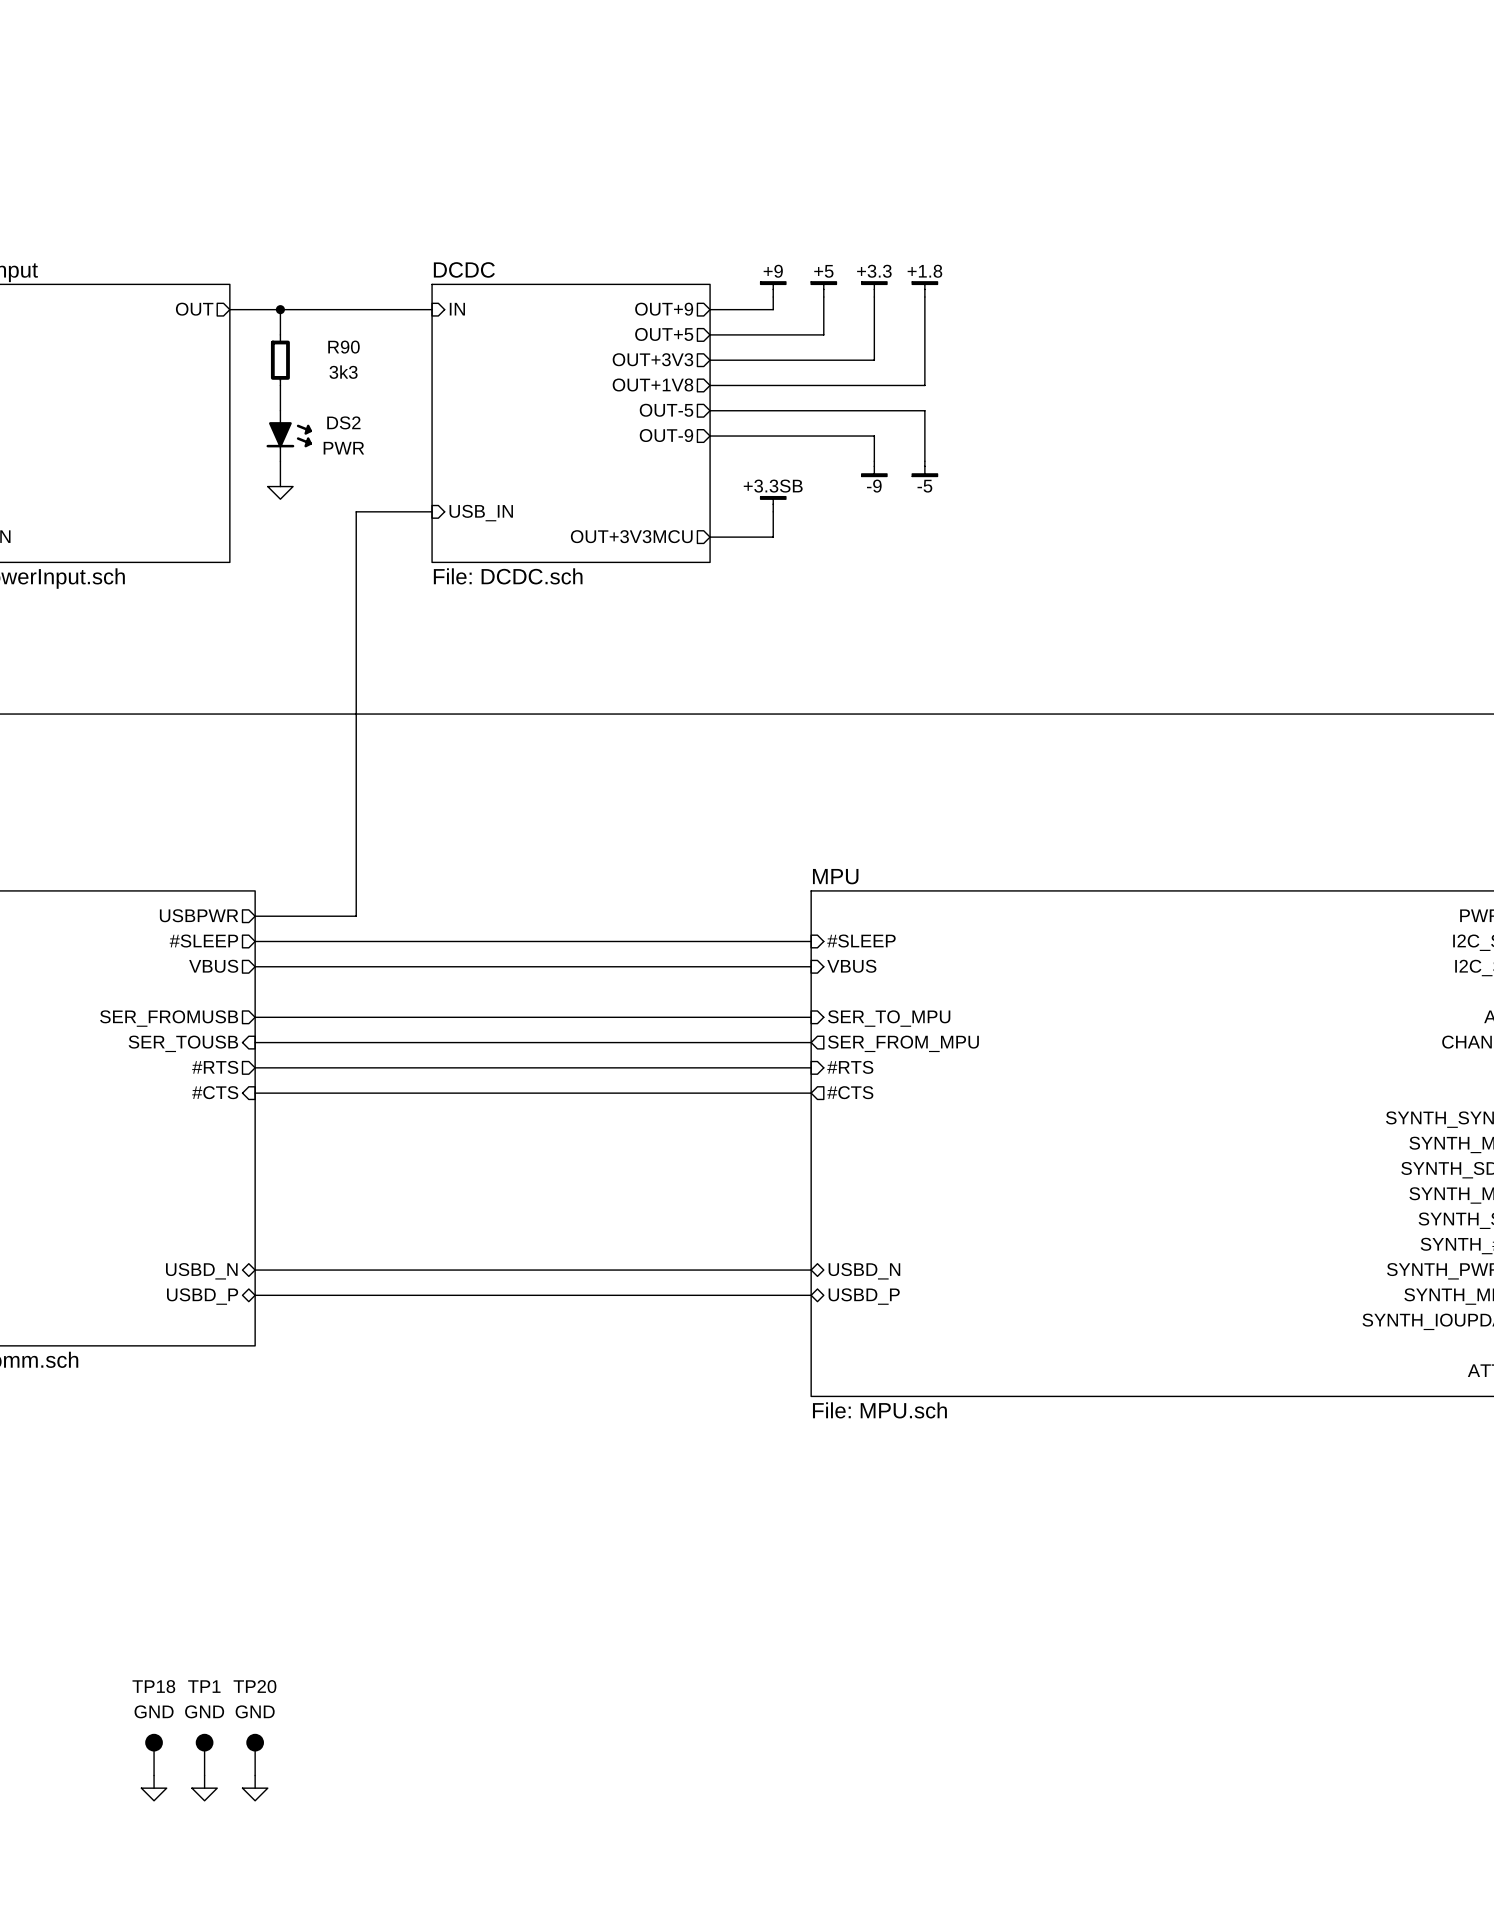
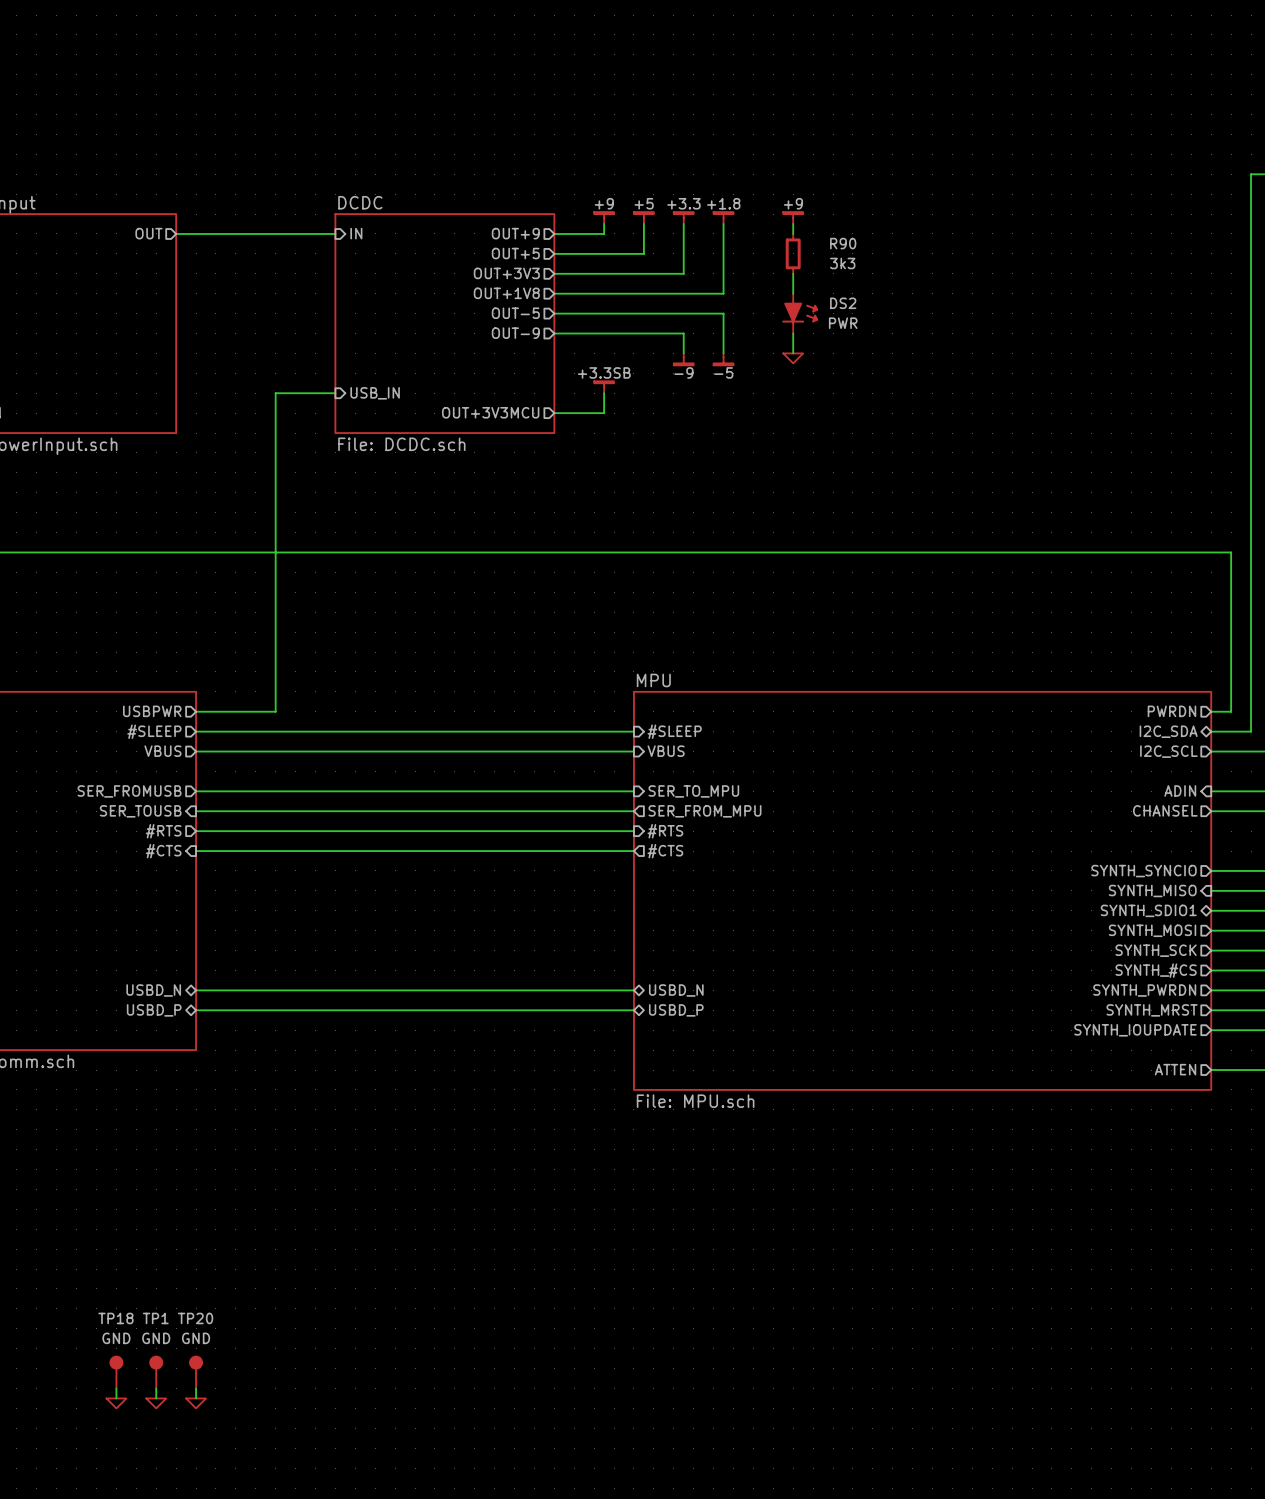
power symbol: none -> +9 (793, 218)
wire: none -> (793, 224) (793, 233)
wire: (280, 309) (280, 334) -> none
junction: (280, 309) -> none
R90 position: (280, 360) -> (793, 253)
wire: none -> (793, 273) (793, 293)
wire: (280, 385) (280, 410) -> none
DS2 position: (289, 436) -> (800, 313)
wire: none -> (793, 333) (793, 353)
wire: (280, 461) (280, 486) -> none
power symbol: none -> (793, 358)
power symbol: (280, 492) -> none

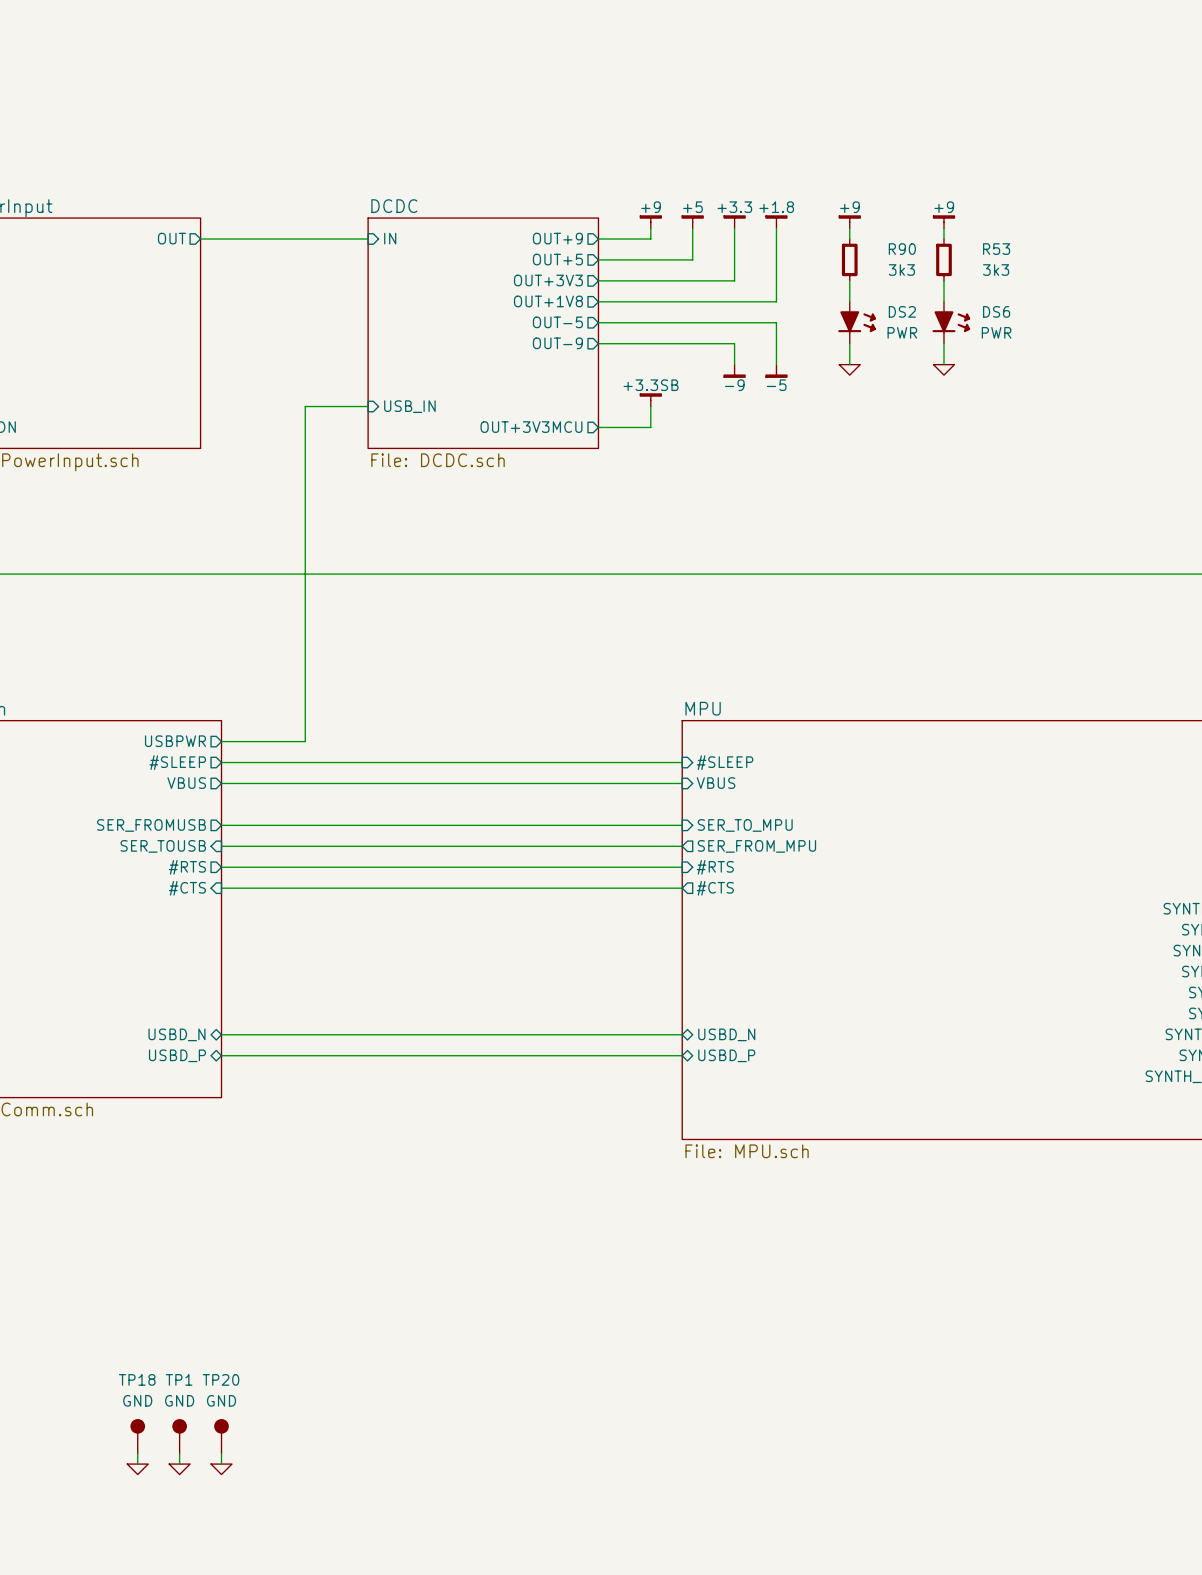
power symbol: none -> +9 (943, 222)
wire: none -> (943, 228) (943, 238)
R53: none -> 3k3 (943, 259)
wire: none -> (943, 280) (943, 301)
DS6: none -> PWR (951, 322)
wire: none -> (943, 343) (943, 364)
power symbol: none -> (943, 369)

